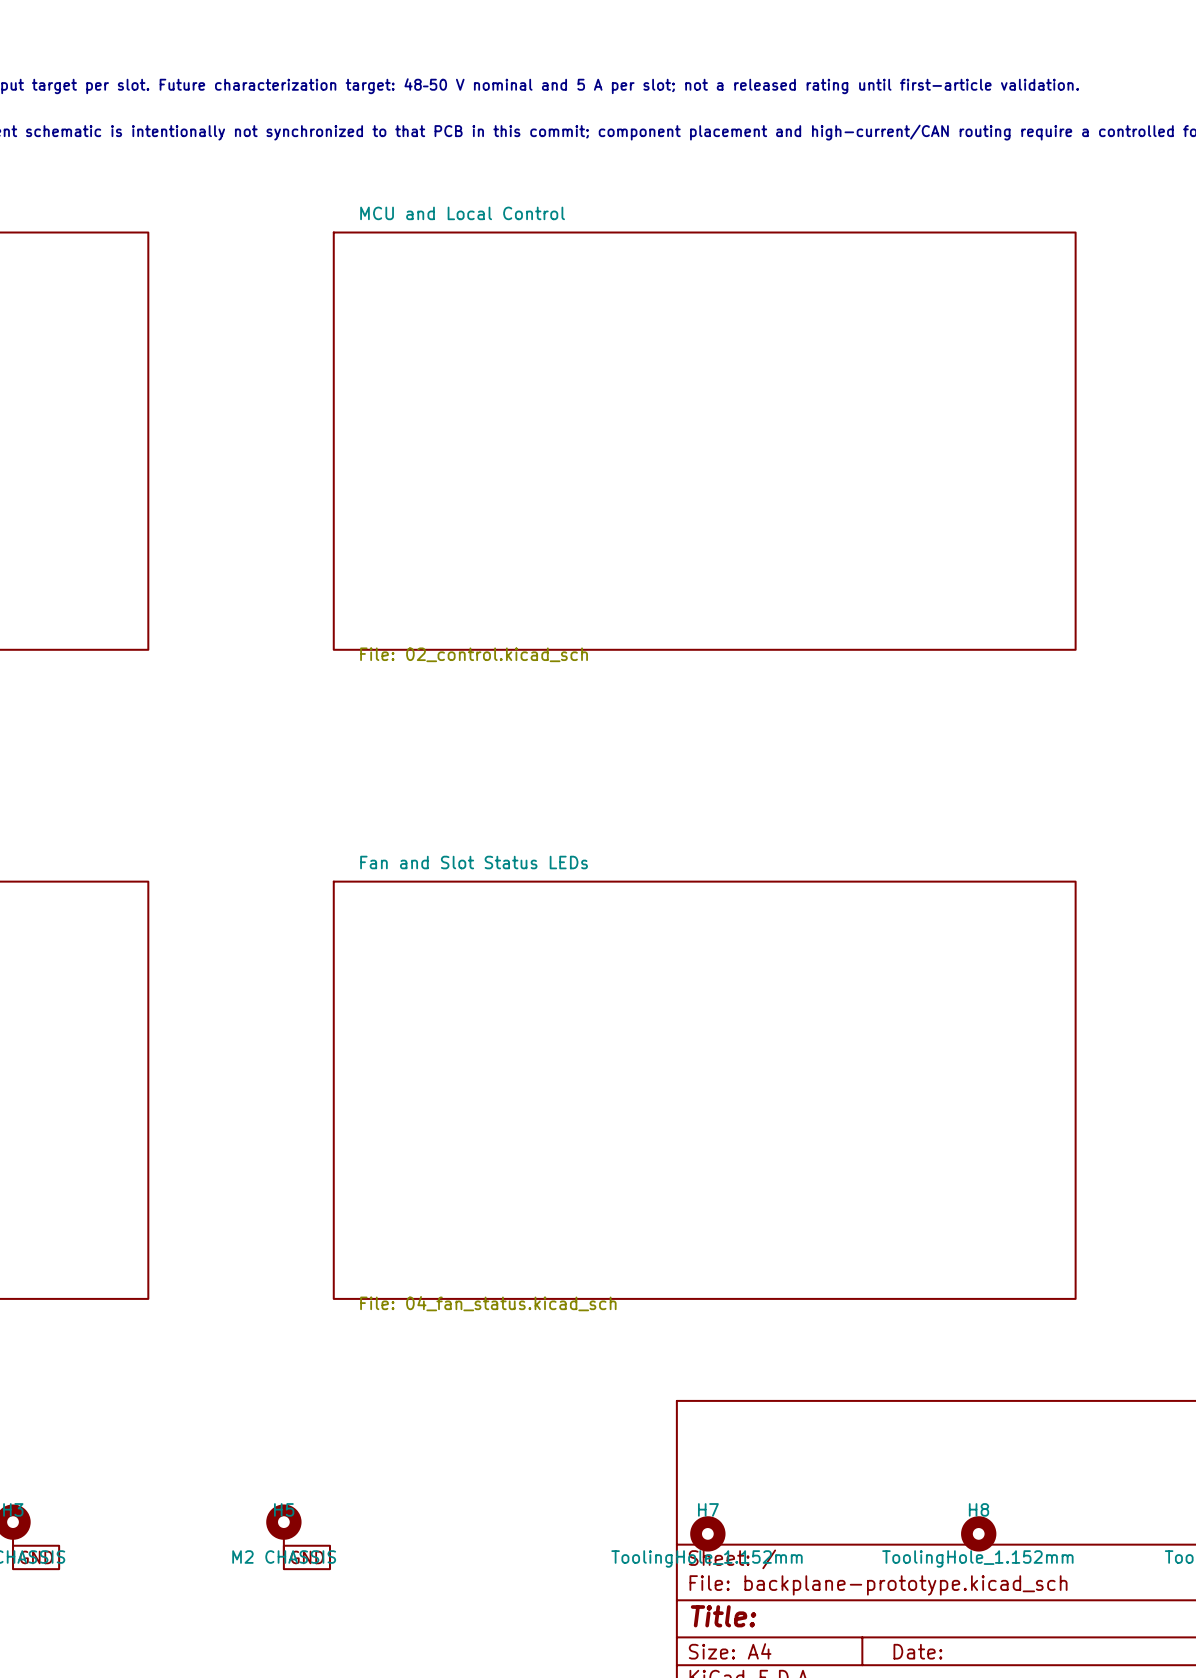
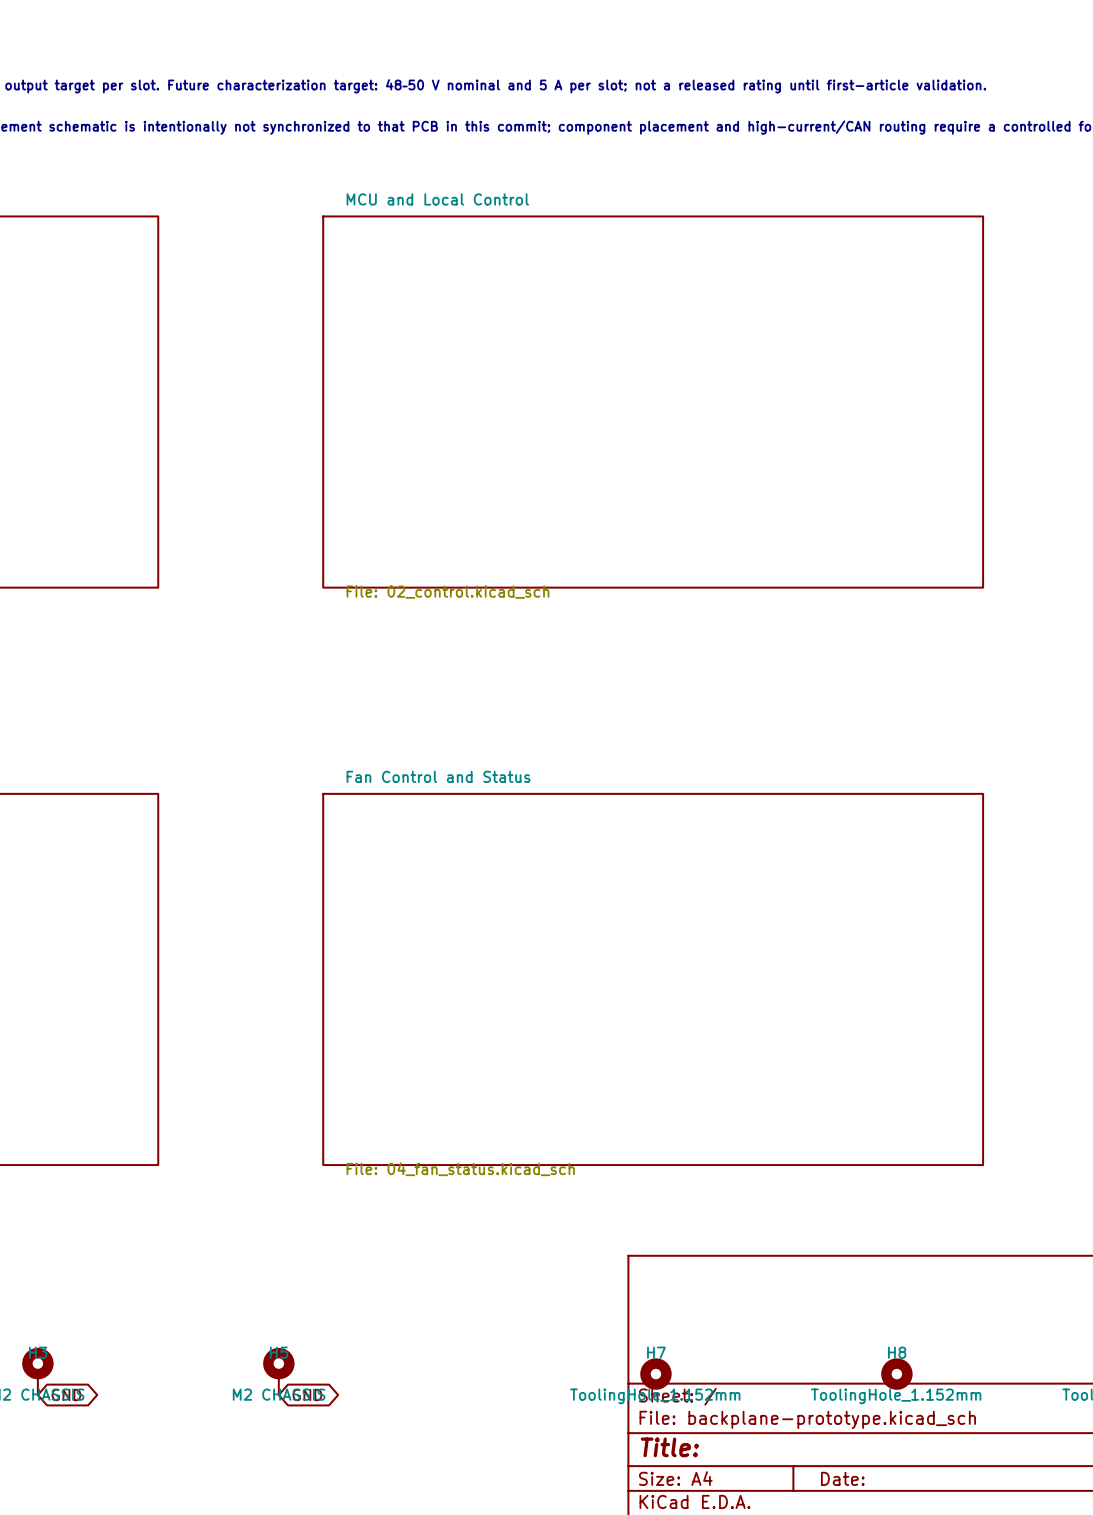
sheet Fan and Slot Status LEDs name: Fan and Slot Status LEDs (474, 862) -> Fan Control and Status (438, 776)
global label shape: passive (36, 1557) -> bidirectional (66, 1395)
global label shape: passive (307, 1557) -> bidirectional (307, 1395)

